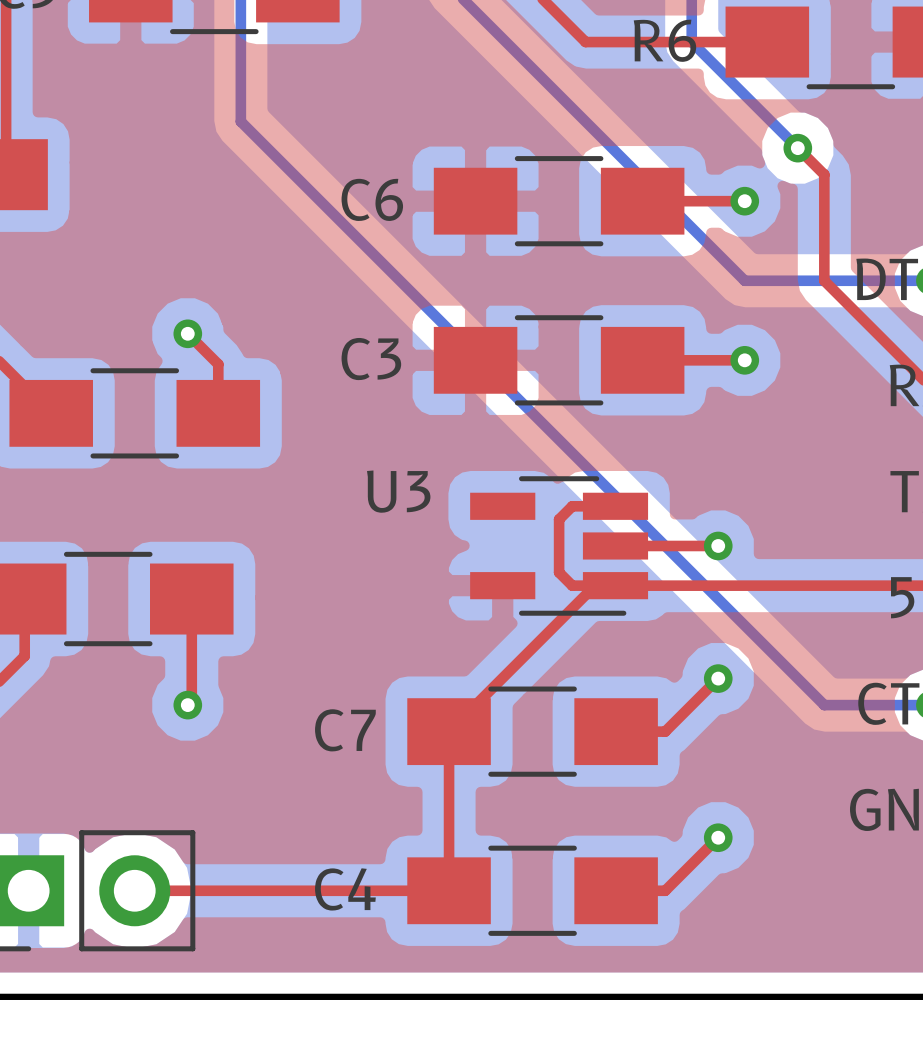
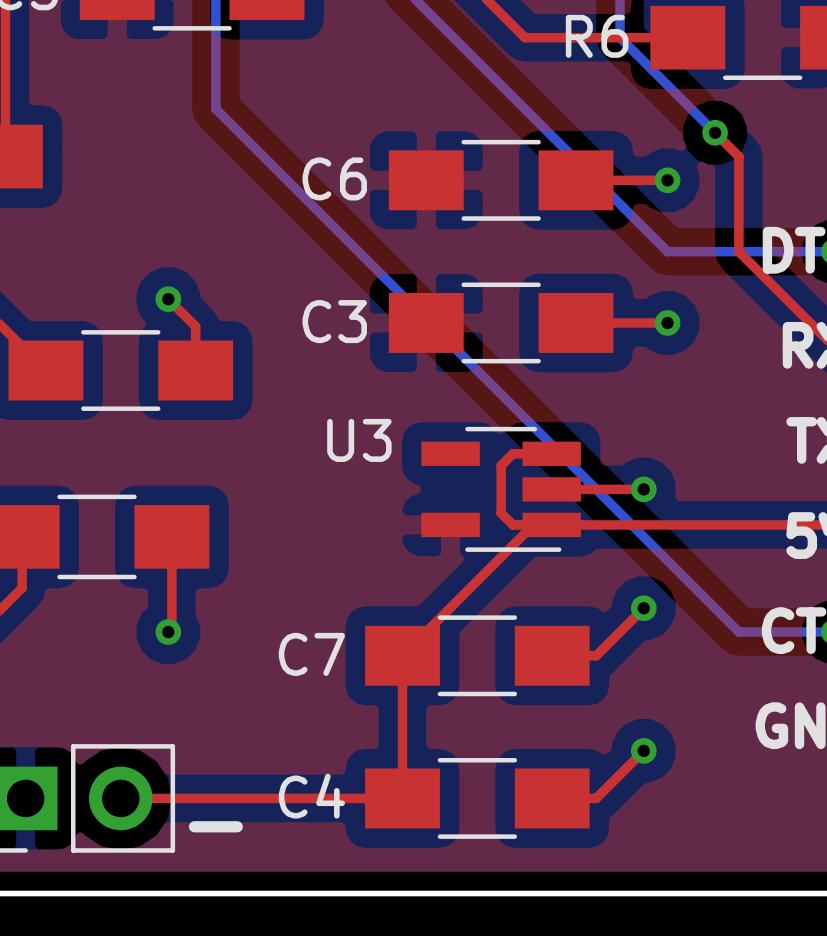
text: none -> - (215, 826)

